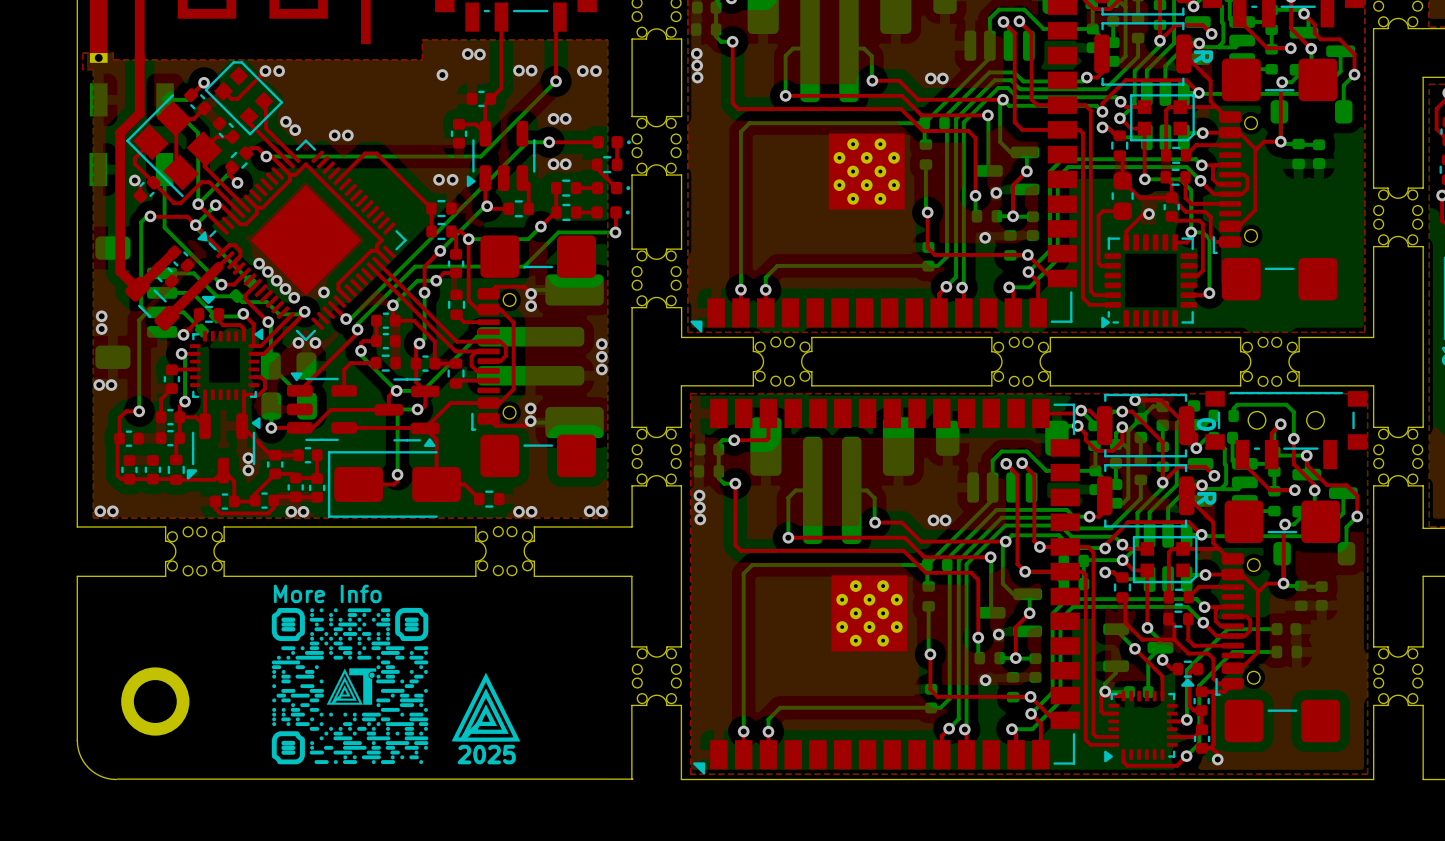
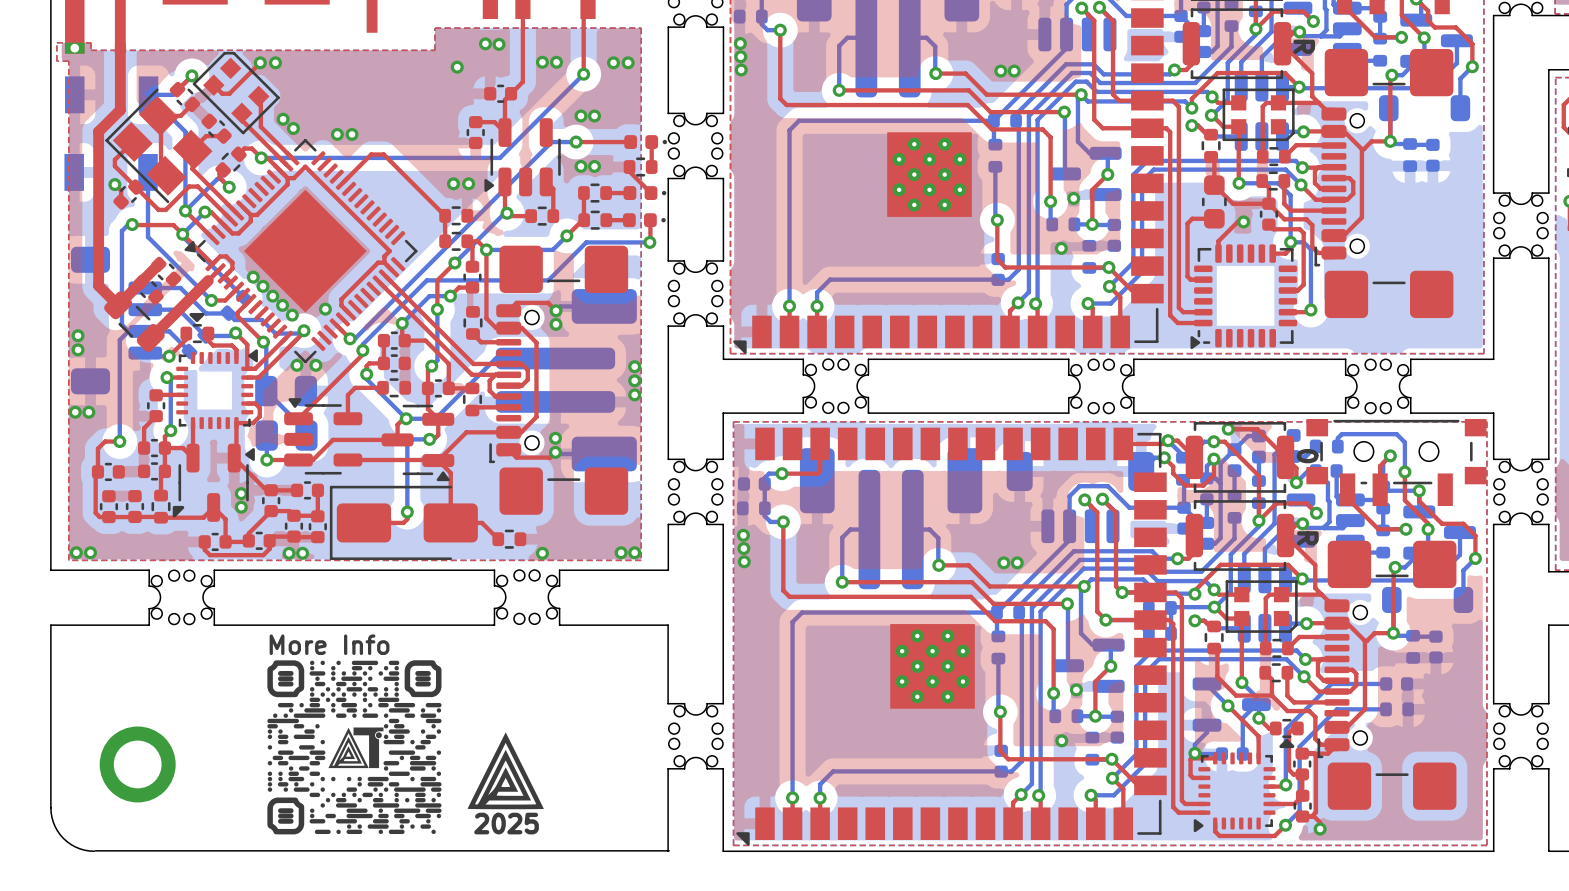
via: (531, 511) -> none

